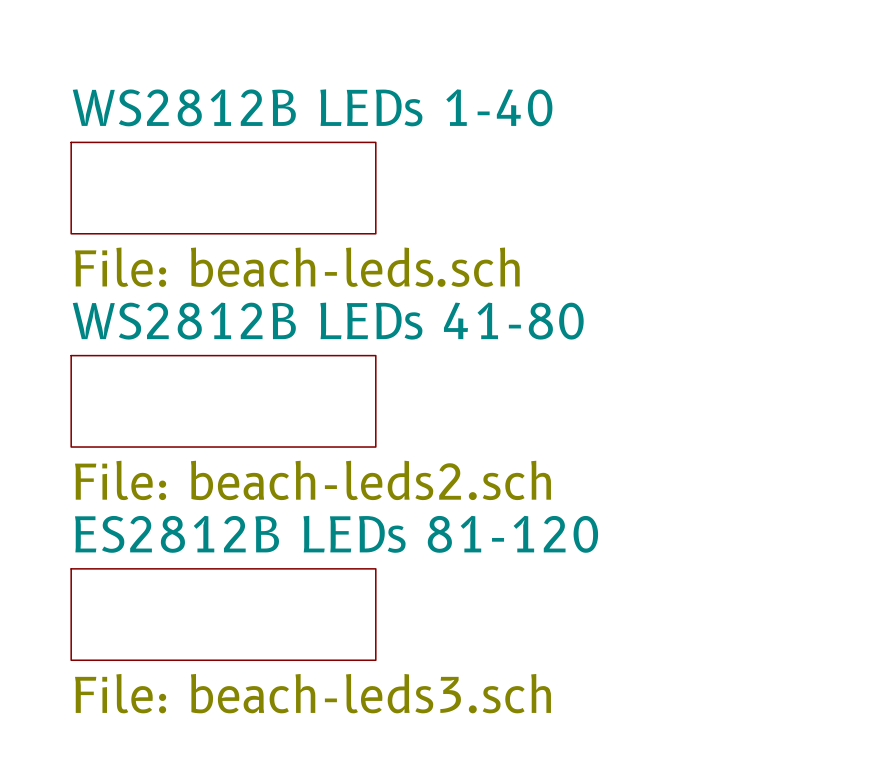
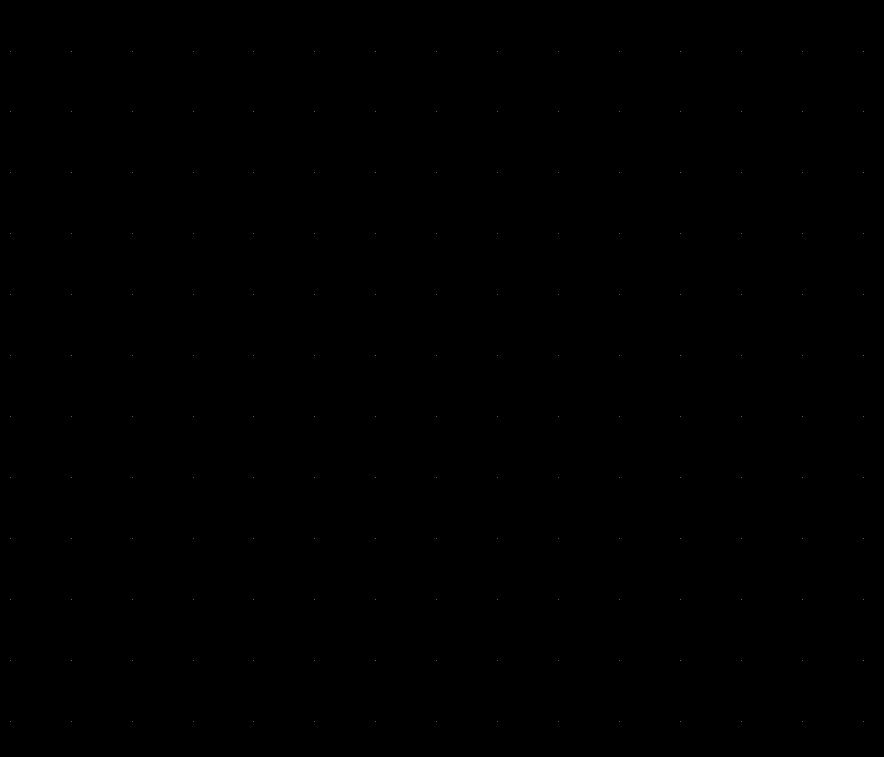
sheet WS2812B LEDs 1-40: File: beach-leds.sch (223, 188) -> none
sheet WS2812B LEDs 41-80: File: beach-leds2.sch (223, 401) -> none
sheet ES2812B LEDs 81-120: File: beach-leds3.sch (223, 614) -> none

